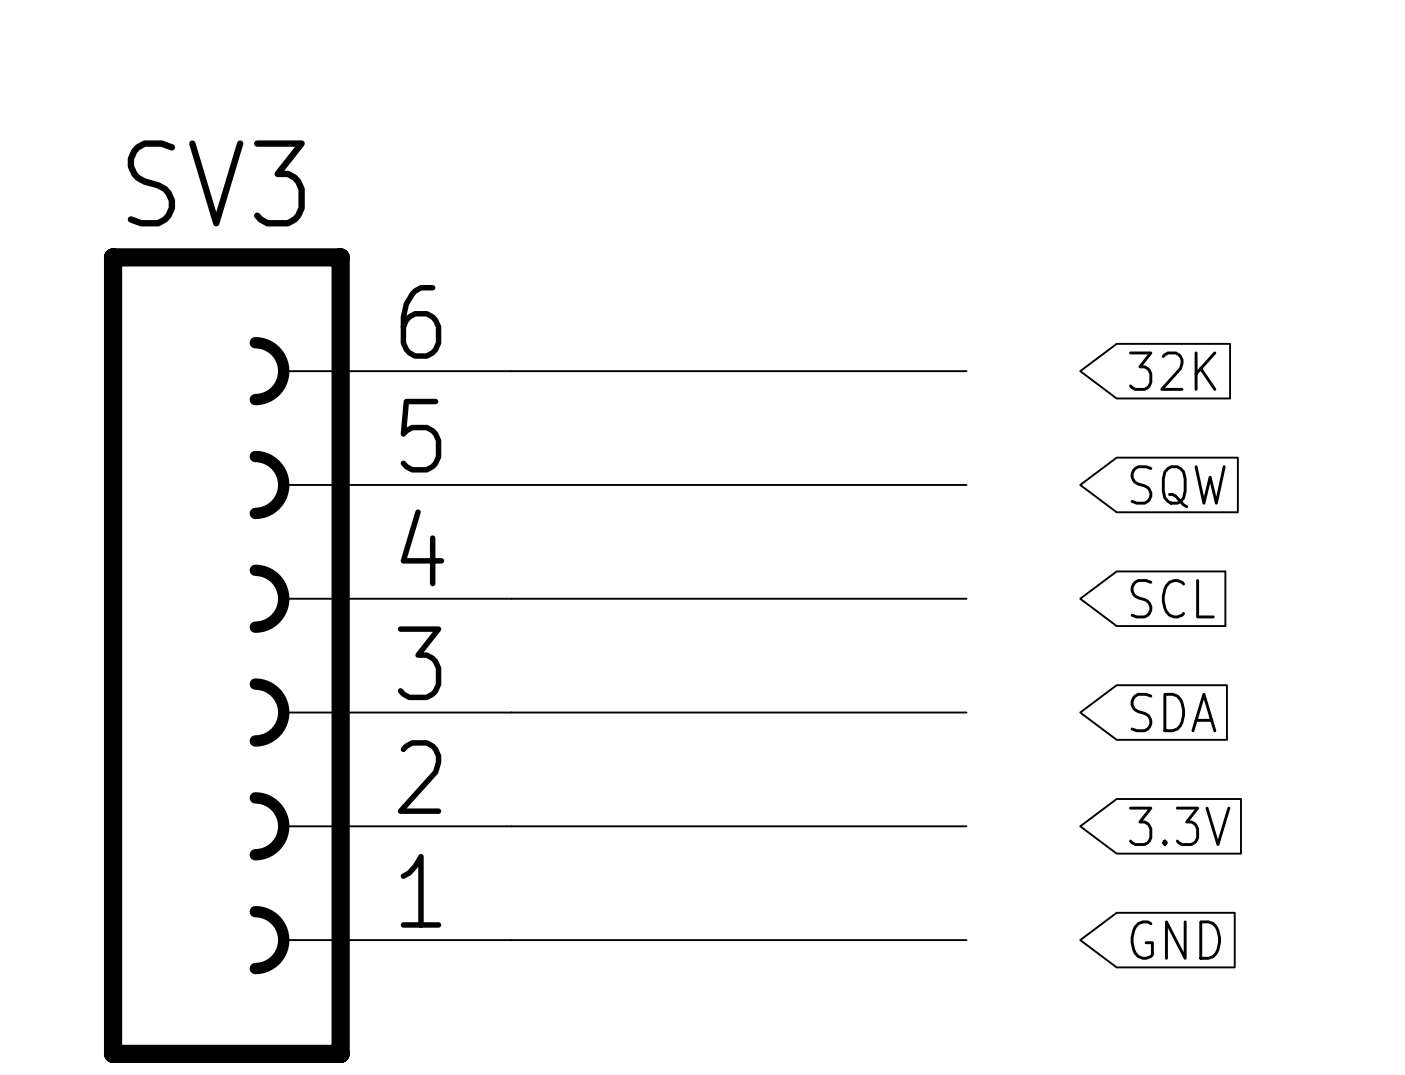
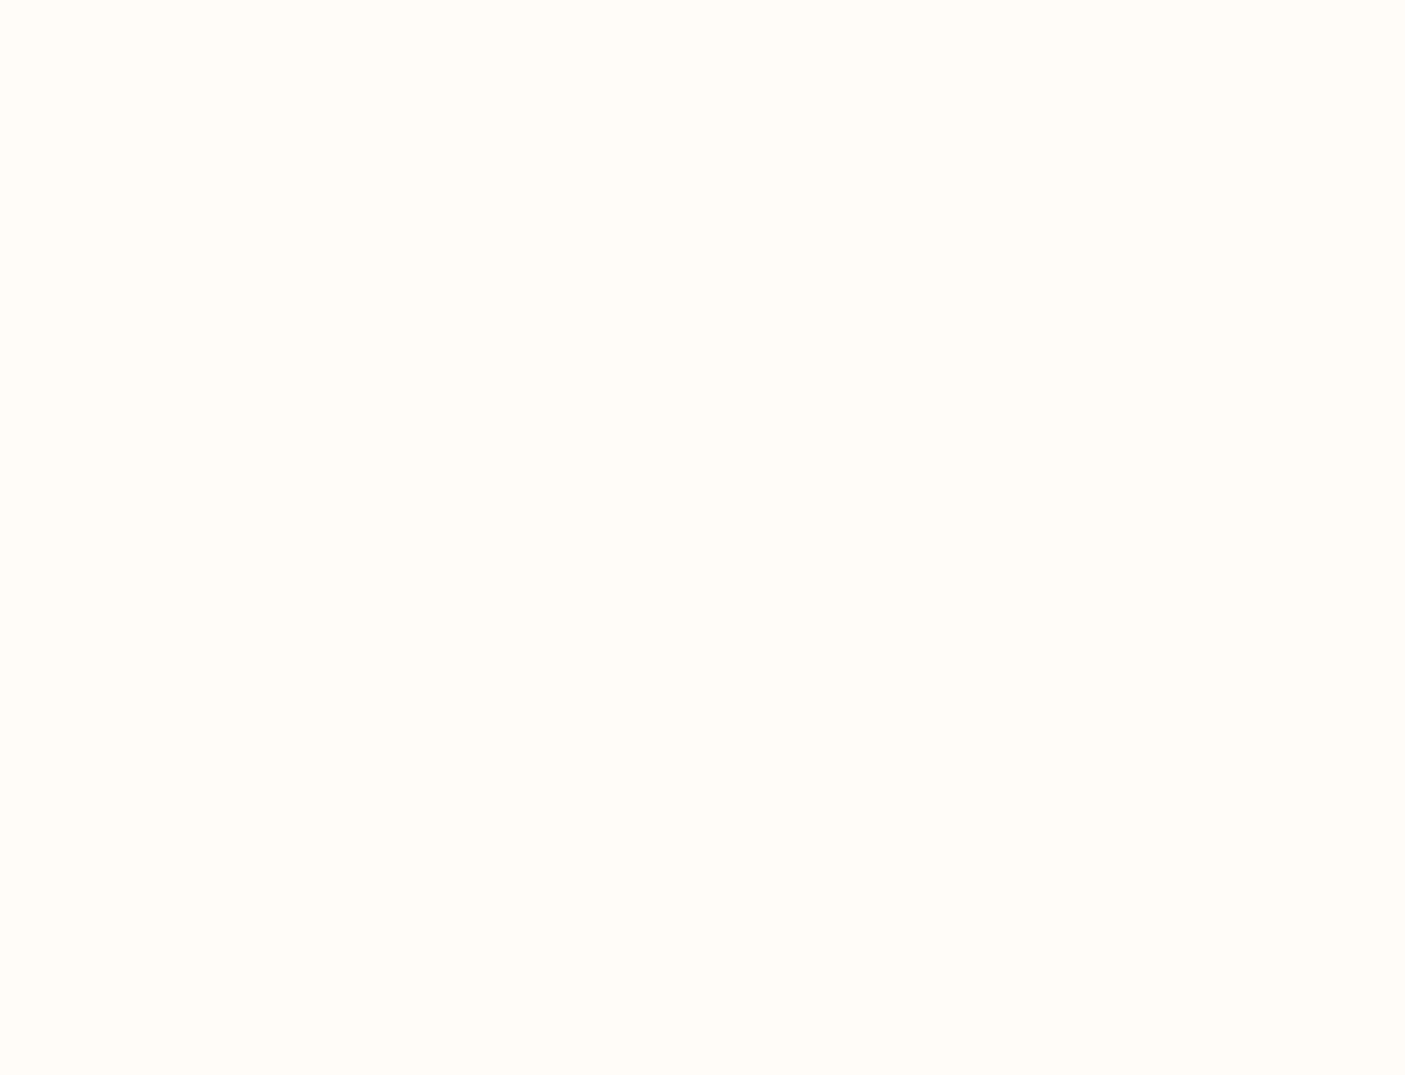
wire: (511, 371) (966, 371) -> none
global label: 32K (1172, 371) -> none
wire: (511, 484) (966, 484) -> none
global label: SQW (1178, 486) -> none
wire: (511, 598) (966, 598) -> none
global label: SCL (1172, 598) -> none
SV3: (307, 655) -> none
wire: (511, 712) (966, 712) -> none
global label: SDA (1173, 712) -> none
wire: (511, 826) (966, 826) -> none
global label: 3.3V (1179, 826) -> none
wire: (511, 940) (966, 940) -> none
global label: GND (1175, 940) -> none

